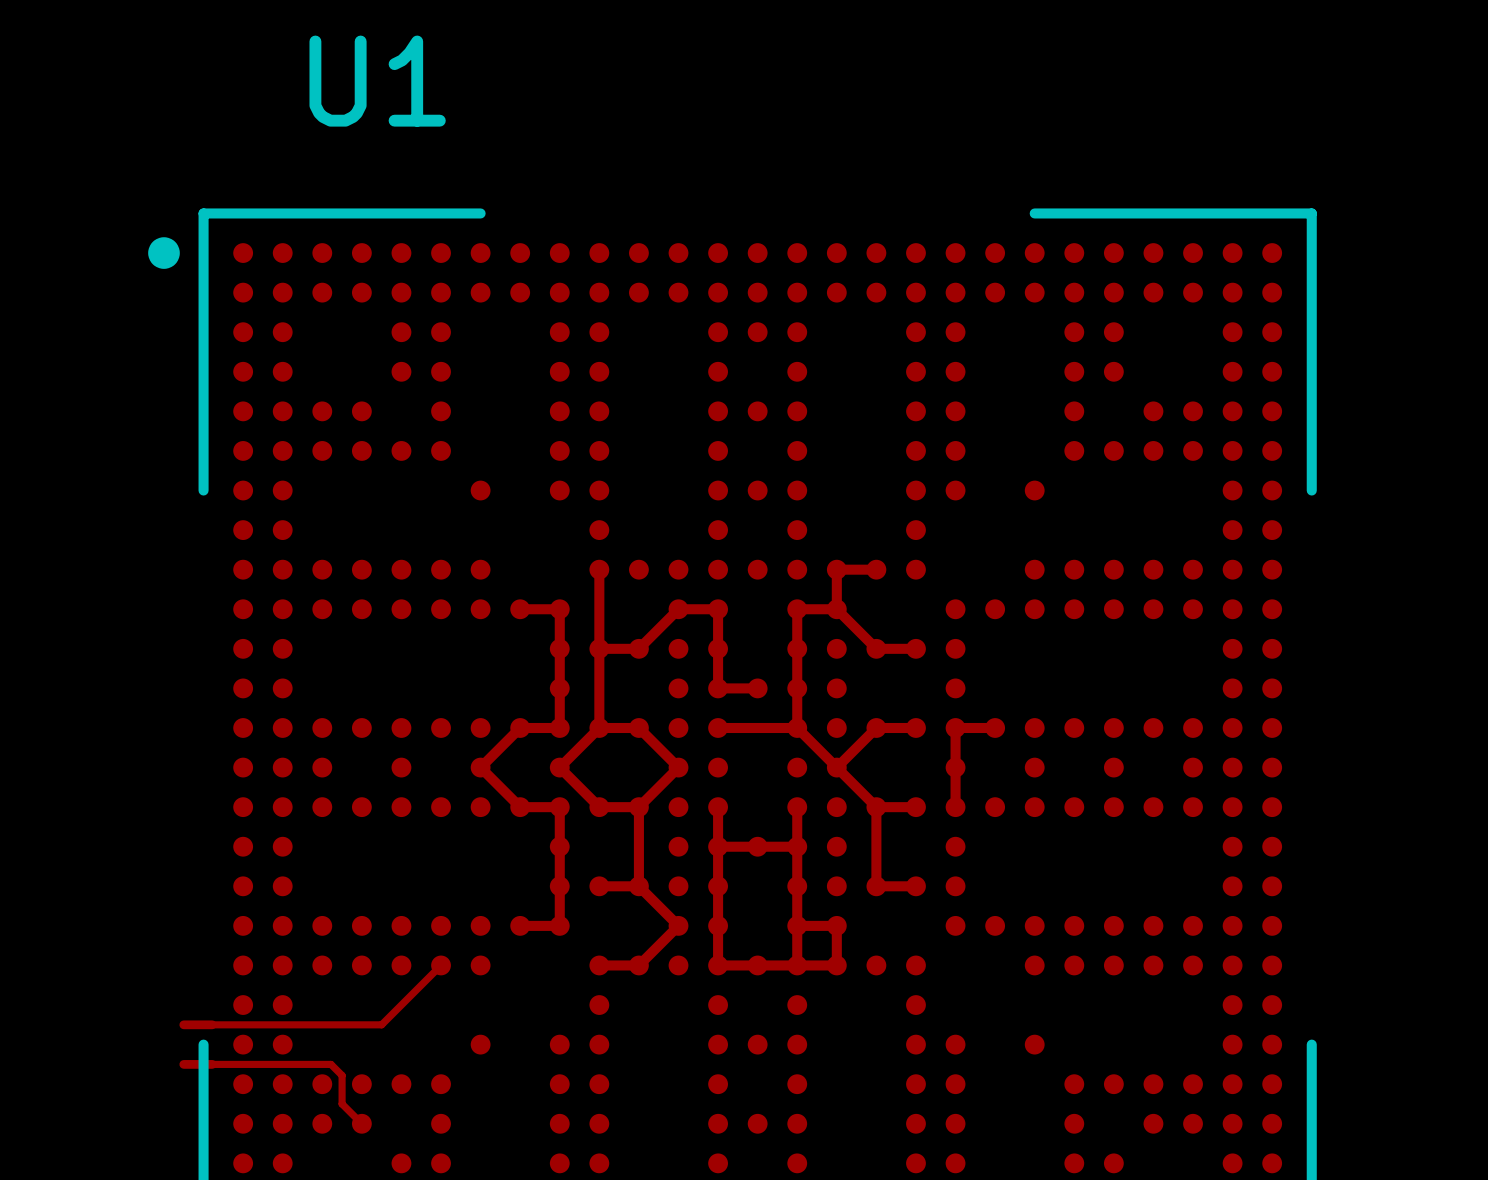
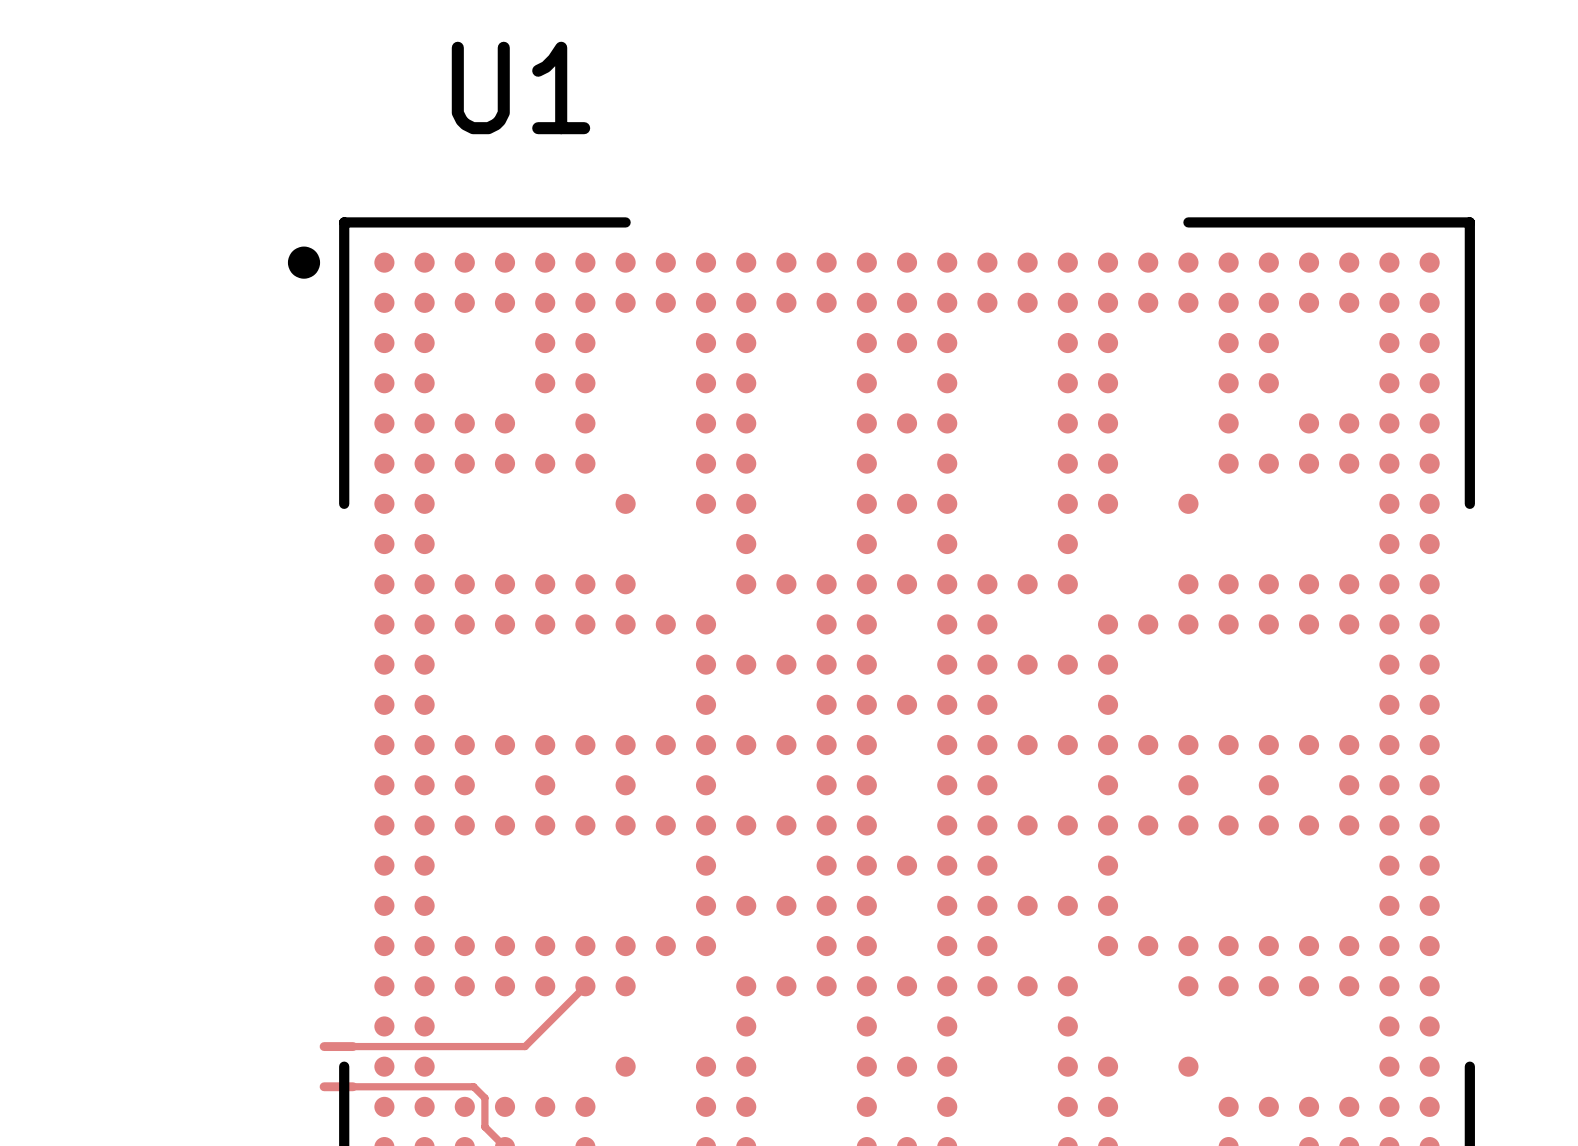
top track: (599, 569) (599, 727) -> none
top track: (876, 569) (836, 569) (836, 609) -> none
top track: (520, 609) (559, 609) (559, 727) (520, 727) (480, 767) (520, 807) (559, 807) (559, 925) (520, 925) -> none
top track: (836, 609) (797, 609) (797, 727) -> none
top track: (836, 609) (876, 648) (915, 648) -> none
top track: (599, 648) (638, 648) (678, 609) (718, 609) (718, 688) (757, 688) -> none
top track: (599, 727) (638, 727) (678, 767) (638, 807) -> none
top track: (599, 727) (559, 767) (599, 807) (638, 807) -> none
top track: (718, 727) (797, 727) -> none
top track: (797, 727) (876, 807) -> none
top track: (915, 727) (876, 727) (836, 767) -> none
top track: (995, 727) (955, 727) (955, 807) -> none
top track: (638, 807) (638, 886) -> none
top track: (718, 807) (718, 965) (836, 965) (836, 925) (797, 925) -> none
top track: (797, 807) (797, 965) -> none
top track: (876, 807) (915, 807) -> none
top track: (876, 807) (876, 886) (915, 886) -> none
top track: (718, 846) (797, 846) -> none
top track: (599, 886) (638, 886) -> none
top track: (638, 886) (678, 925) (638, 965) (599, 965) -> none

